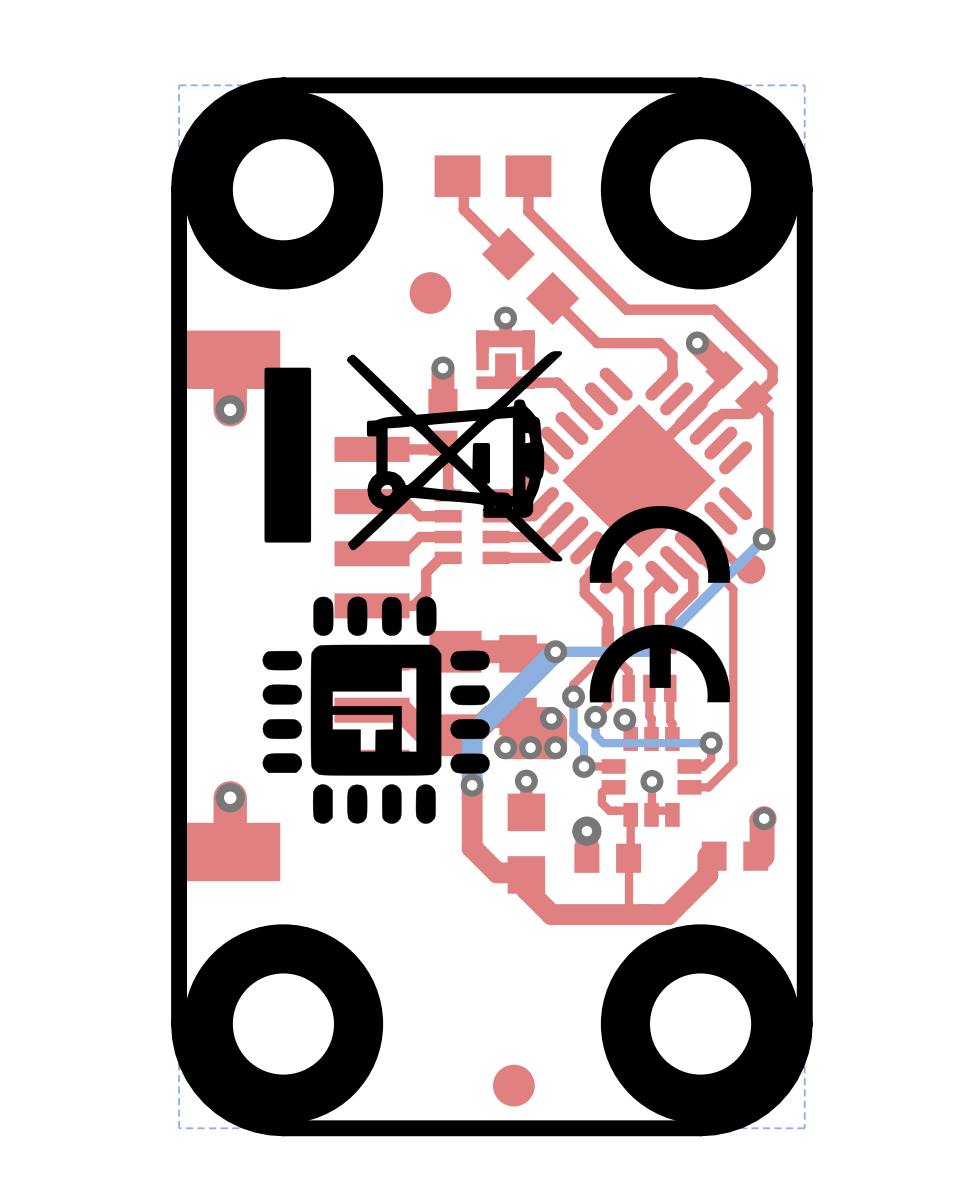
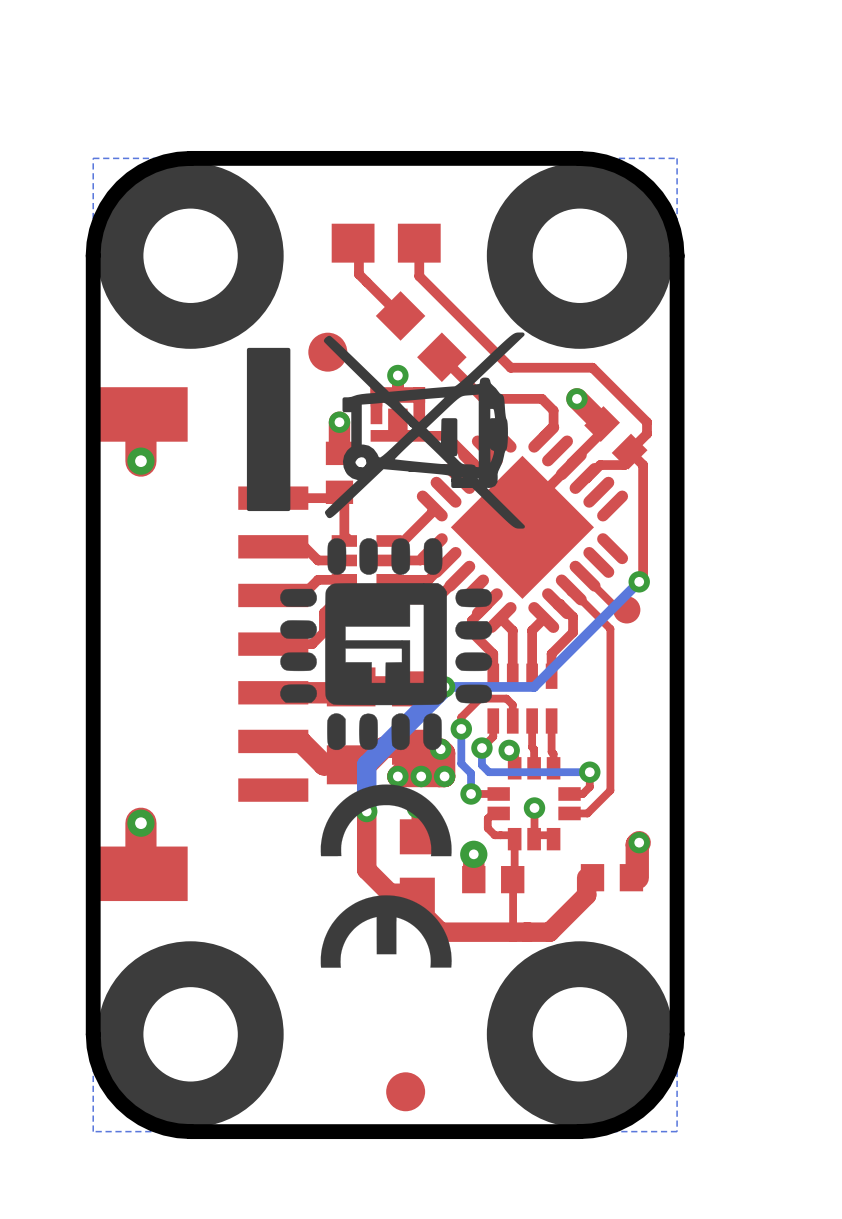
drawing position: (413, 456) -> (385, 430)
drawing position: (659, 604) -> (386, 876)
drawing position: (376, 710) -> (386, 644)

